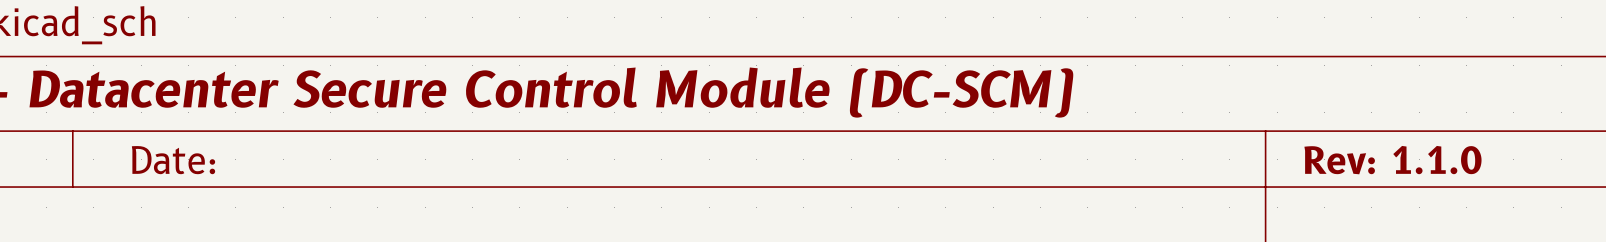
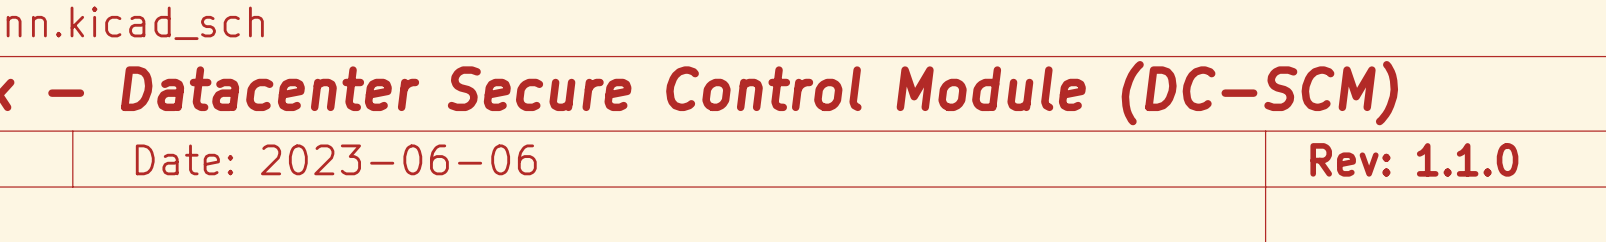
title block: Date: (173, 160) -> Date: 2023-06-06 (336, 159)

